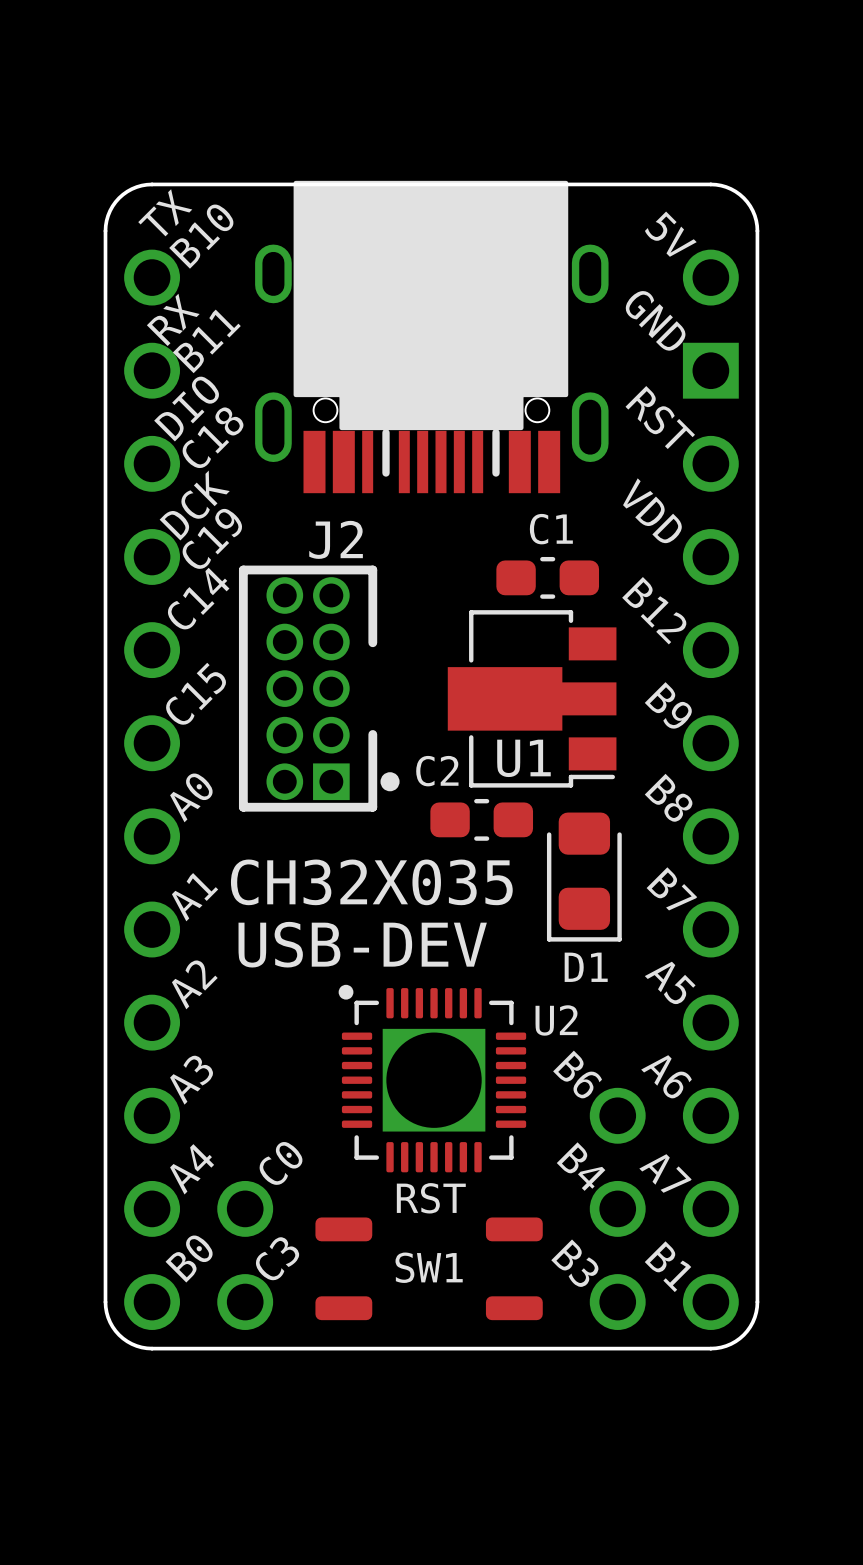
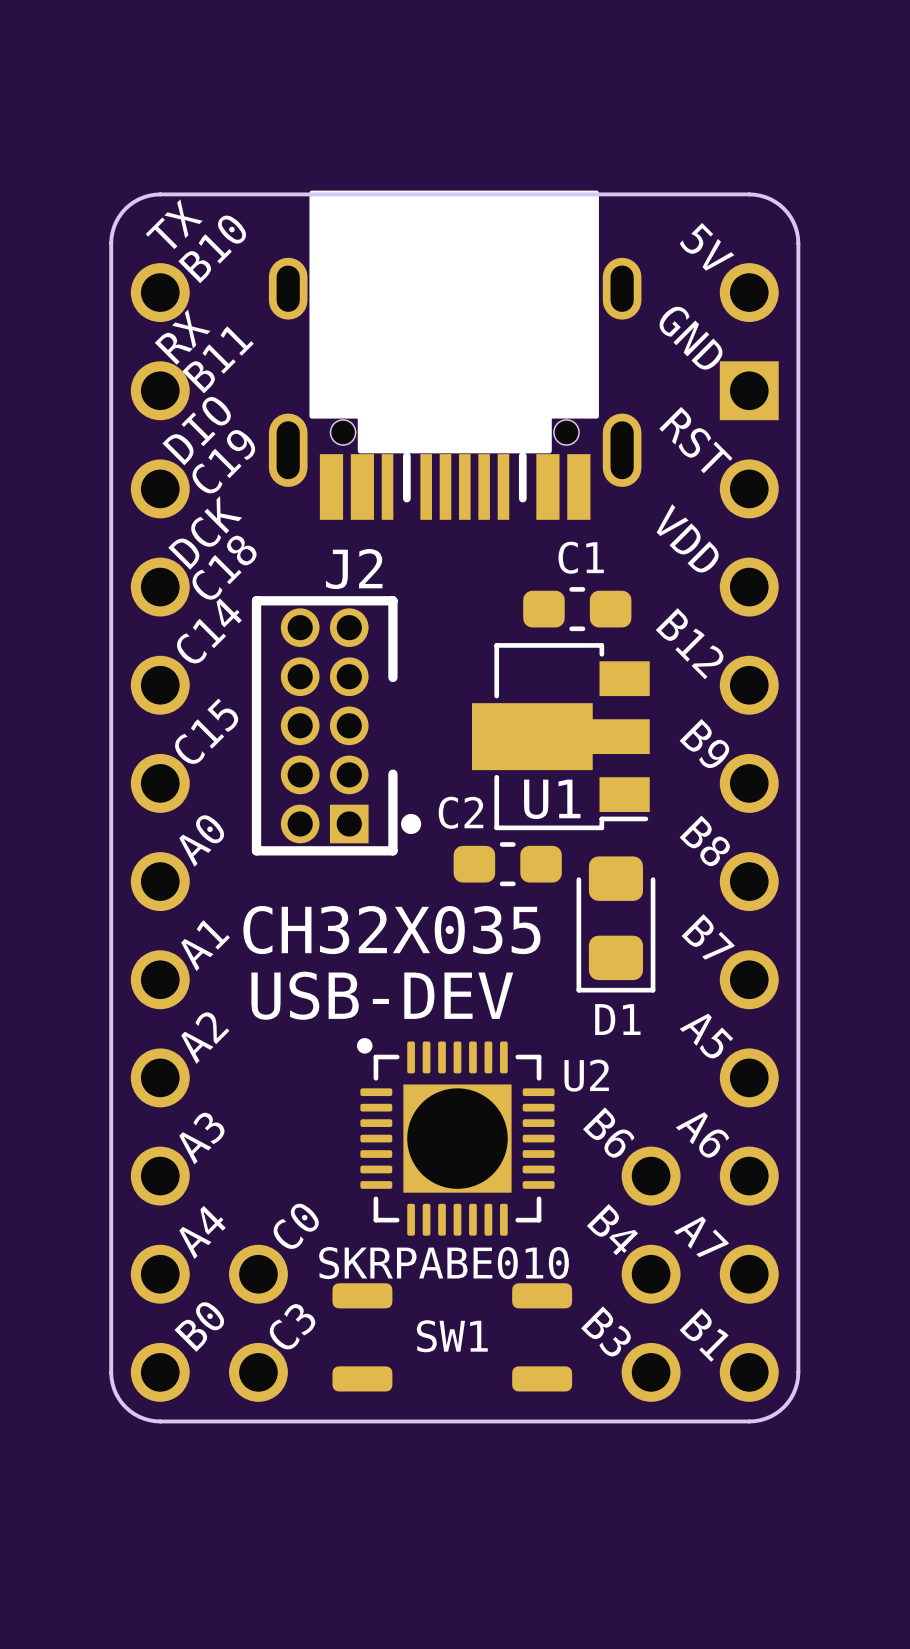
text: C18 (212, 437) -> C19 (223, 461)
text: C19 (212, 538) -> C18 (224, 567)
SW1 value: none -> SKRPABE010 (444, 1263)
SW1 text: RST (431, 1198) -> none

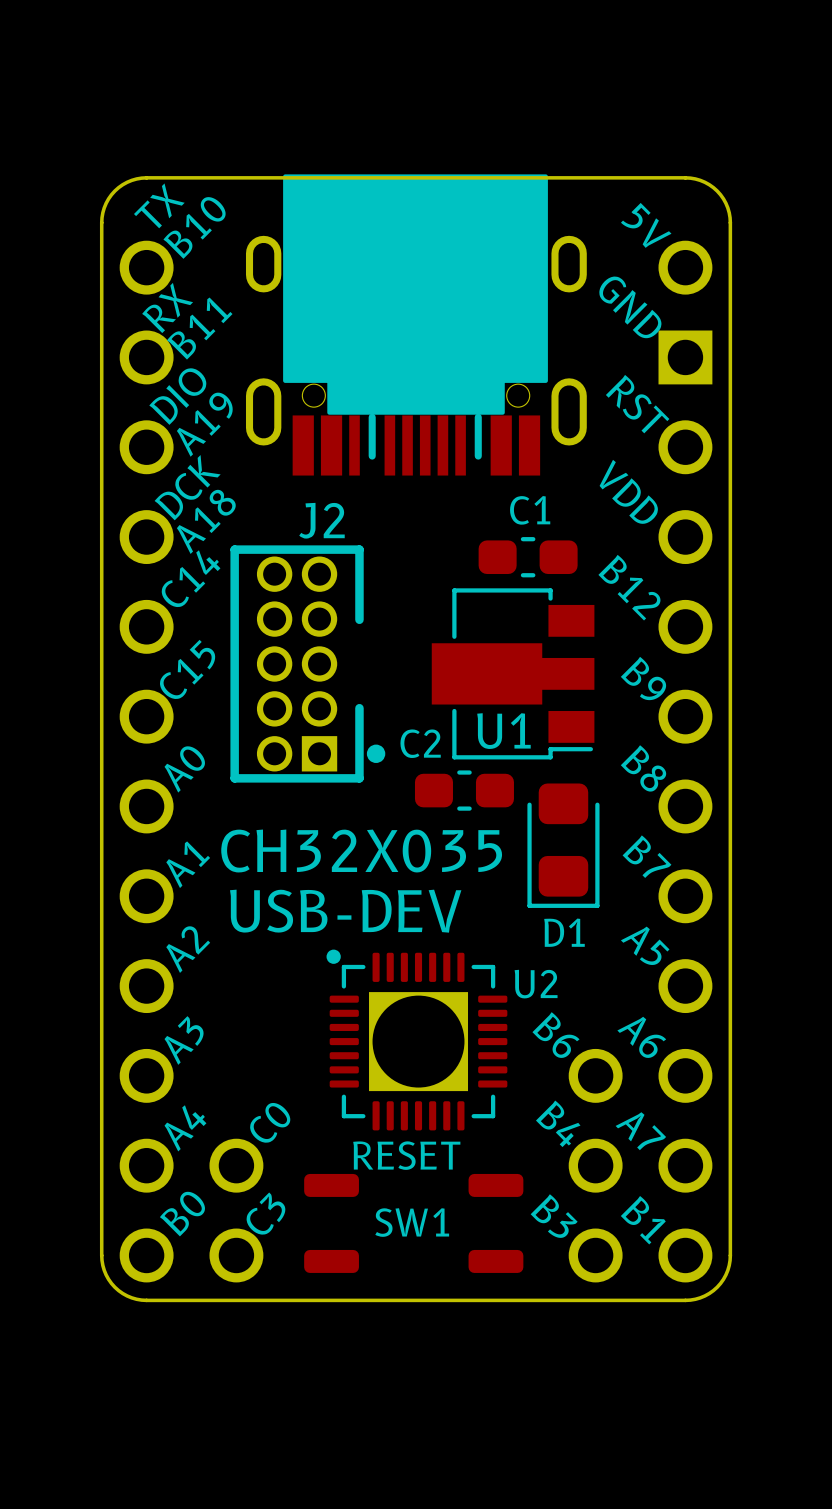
text: C19 (223, 461) -> A19 (204, 424)
text: C18 (224, 567) -> A18 (206, 521)
SW1 value: SKRPABE010 (444, 1263) -> RESET (406, 1155)

